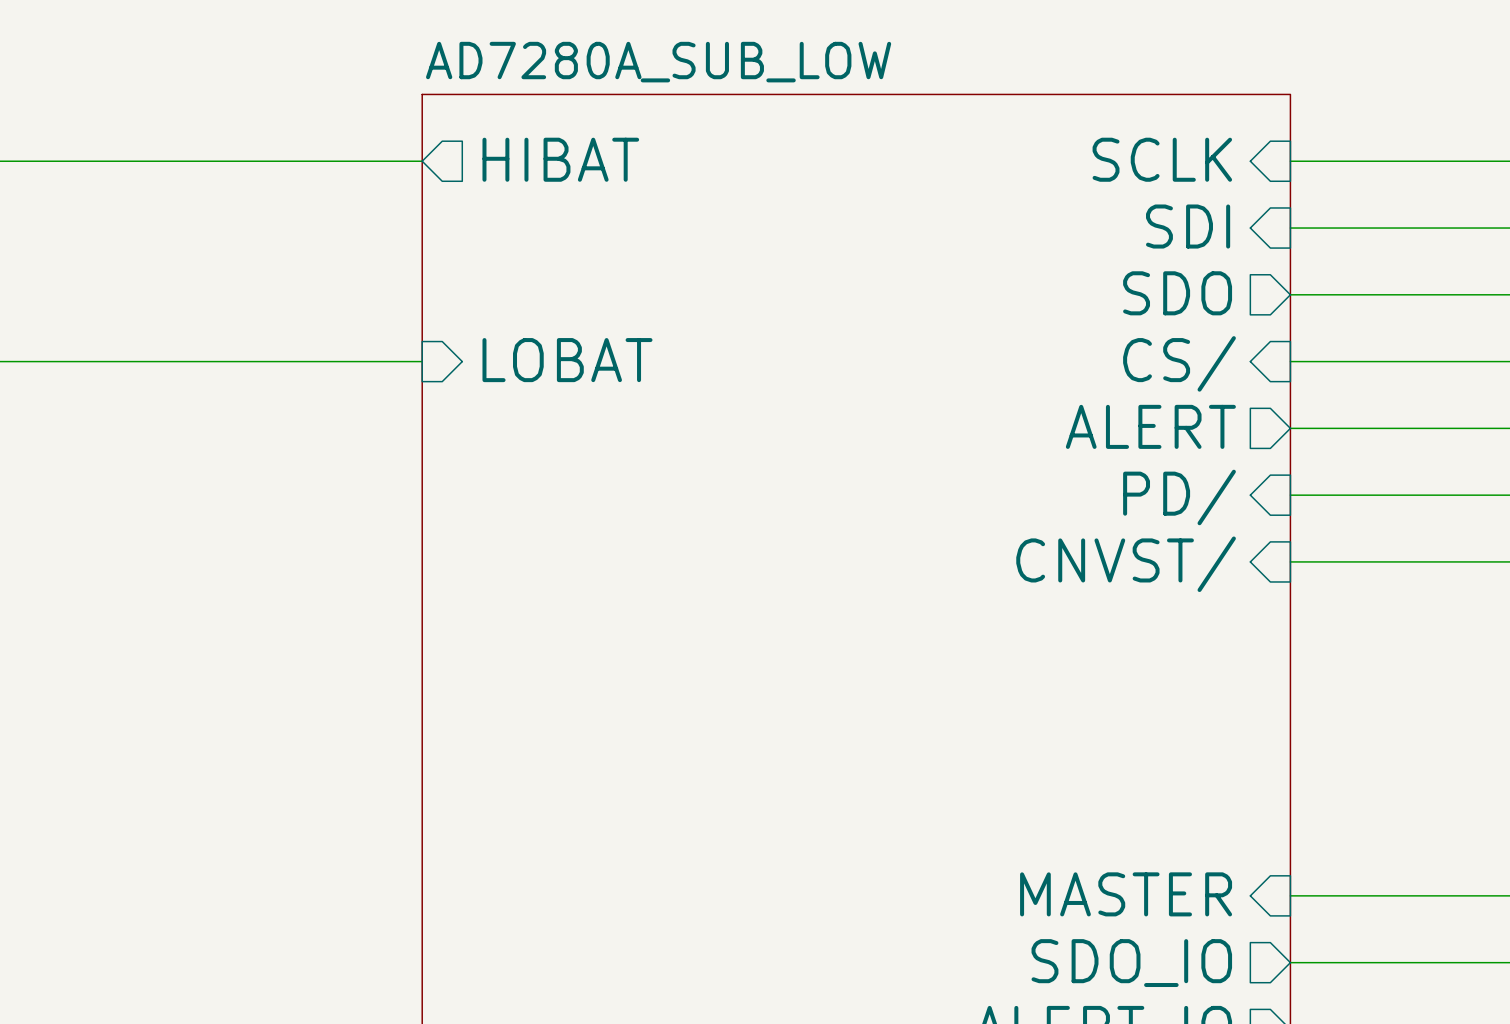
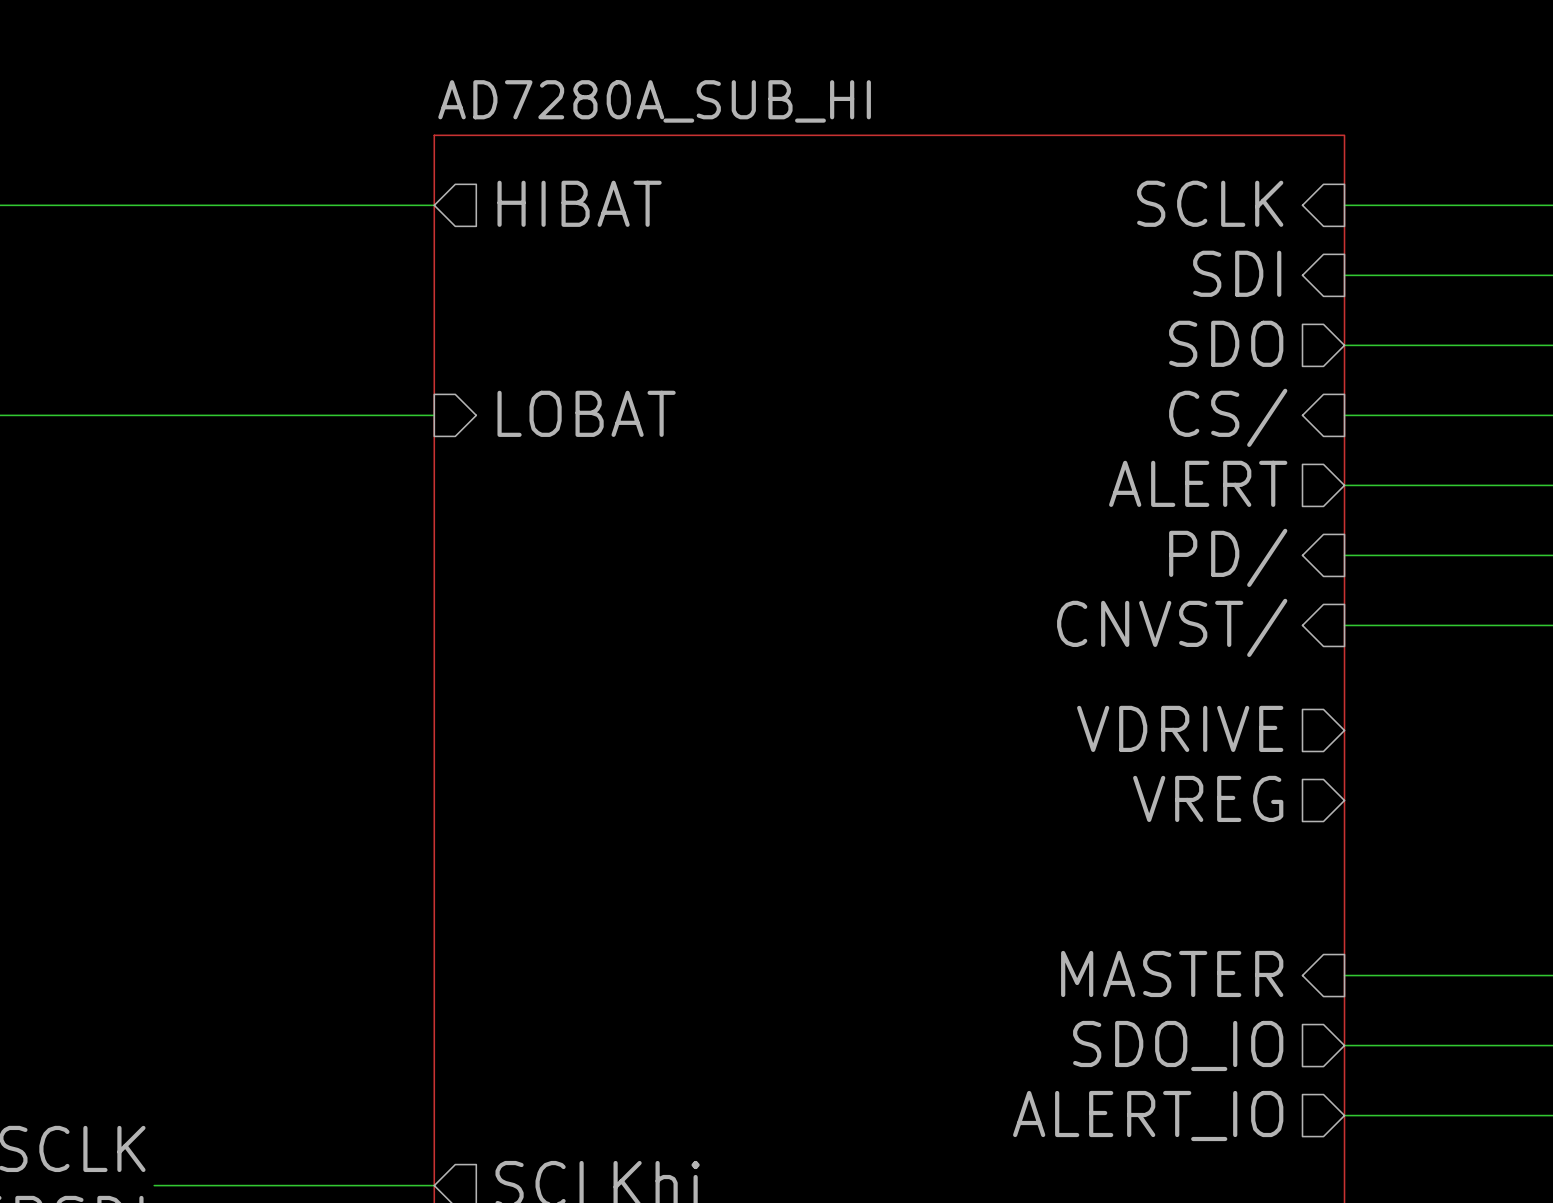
sheet AD7280A_SUB_LOW name: AD7280A_SUB_LOW (658, 62) -> AD7280A_SUB_HI (654, 101)
sheet pin: none -> VDRIVE (1180, 728)
sheet pin: none -> VREG (1208, 798)

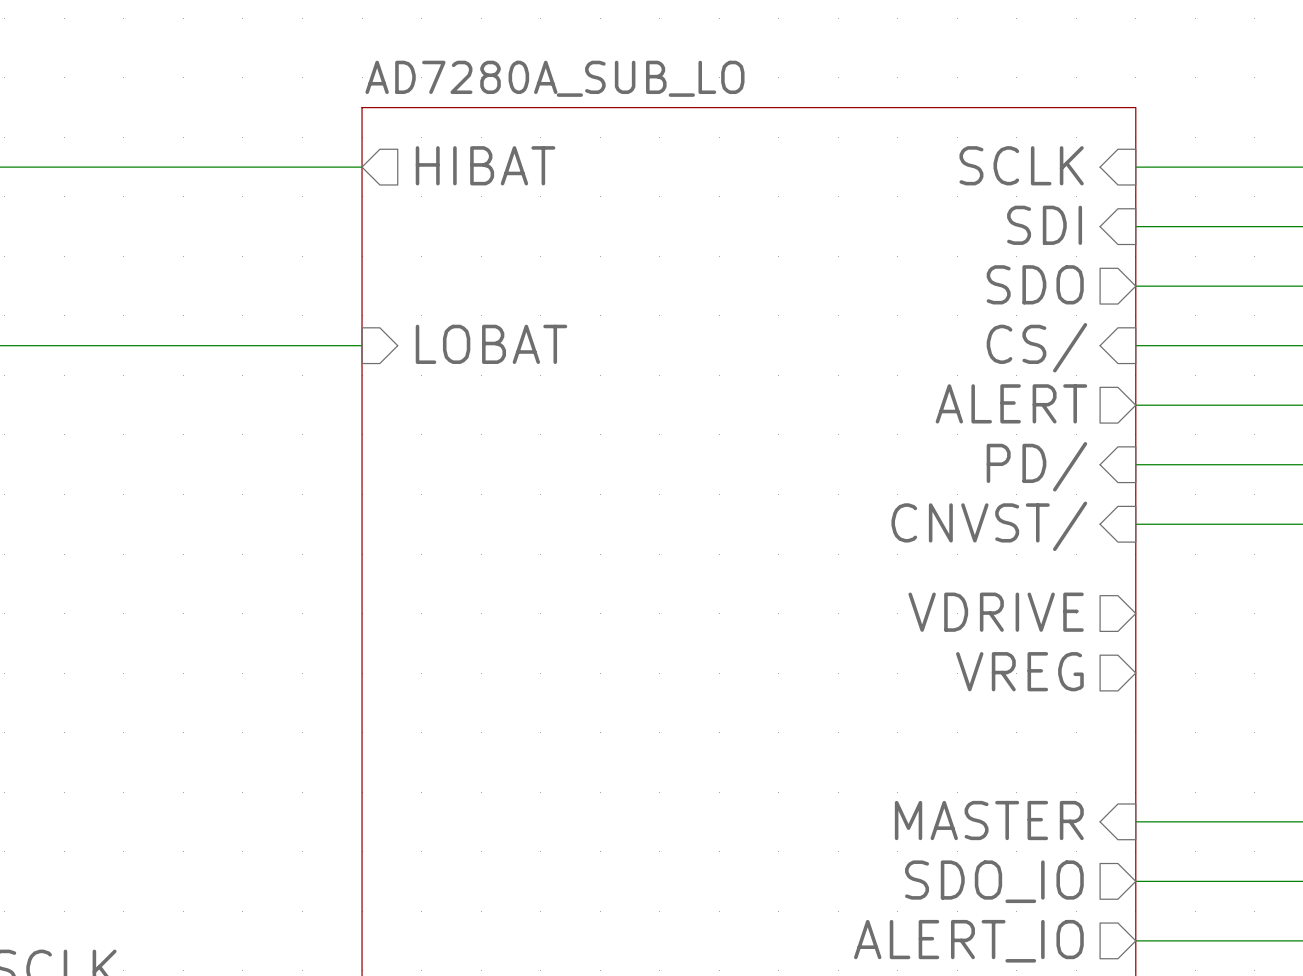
sheet AD7280A_SUB_HI name: AD7280A_SUB_HI (654, 101) -> AD7280A_SUB_LO (554, 78)

